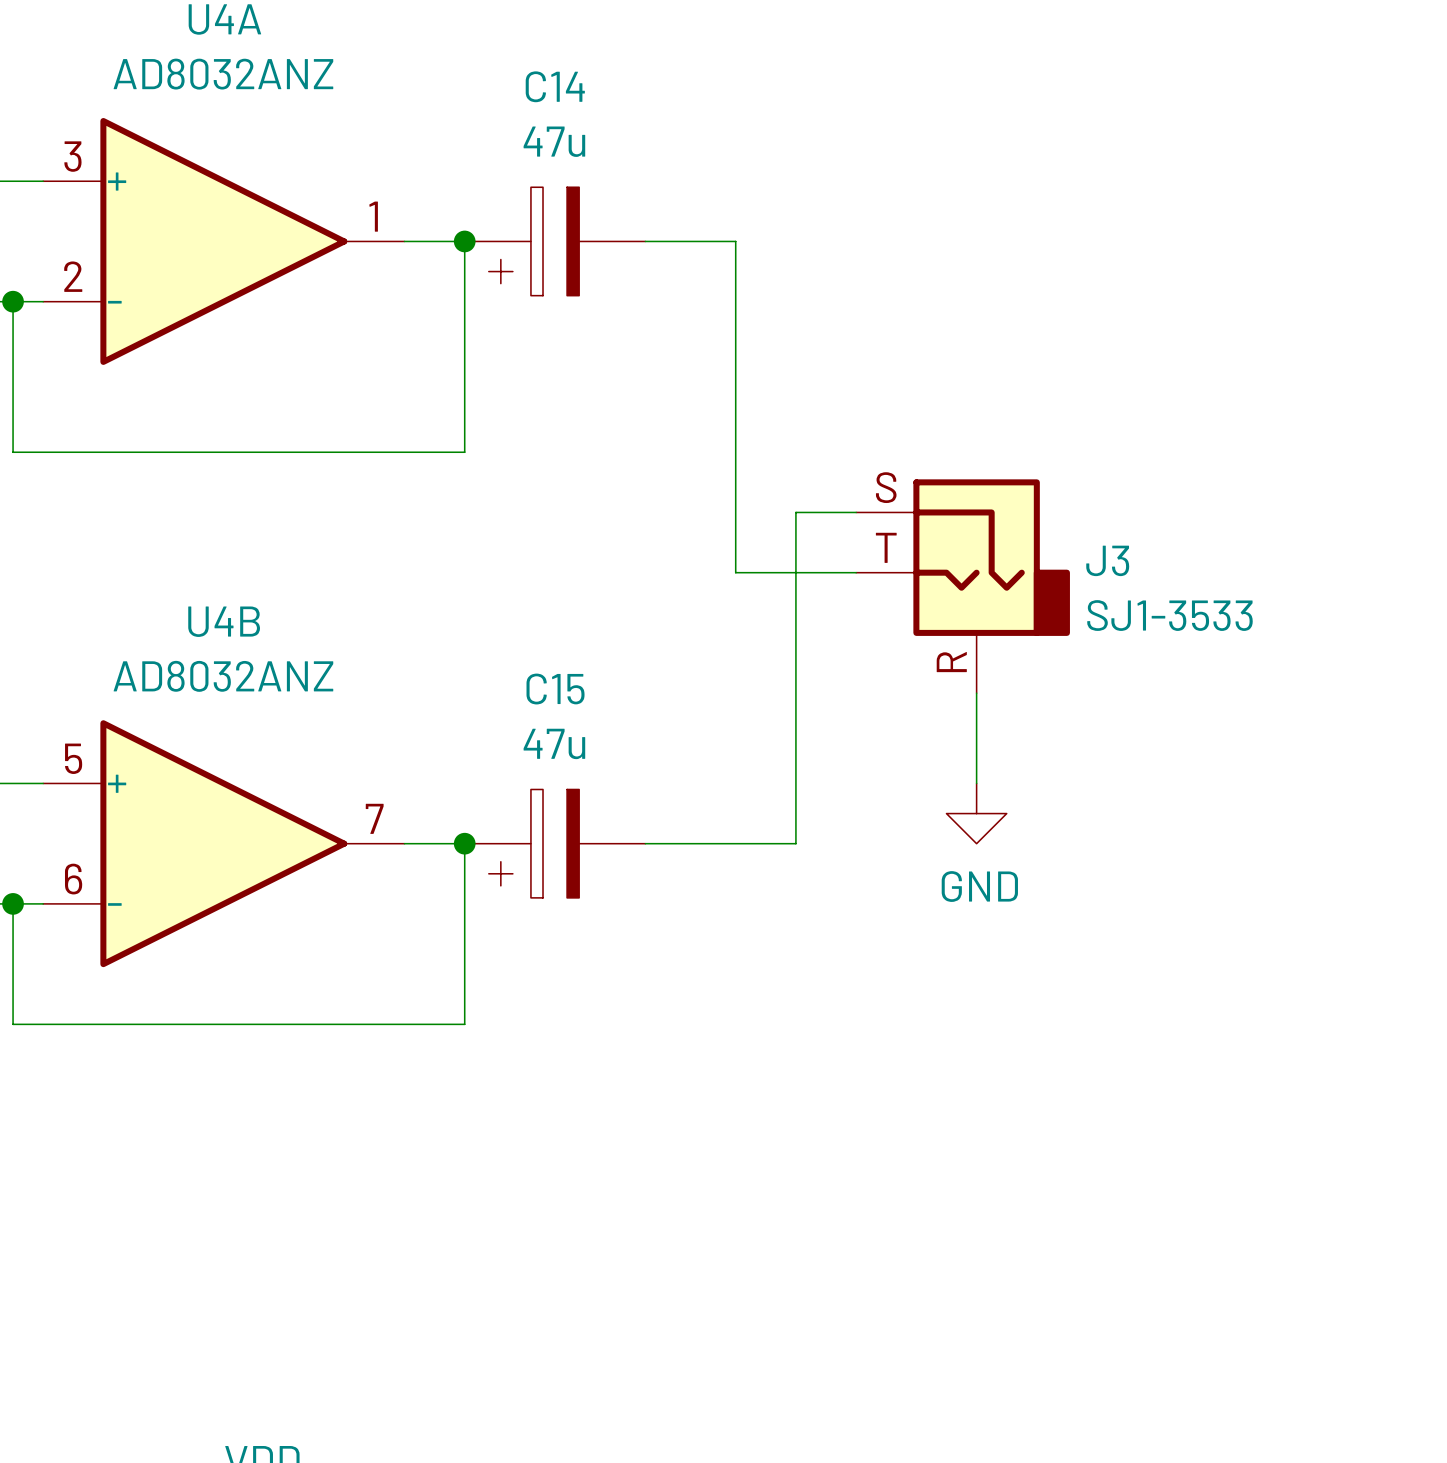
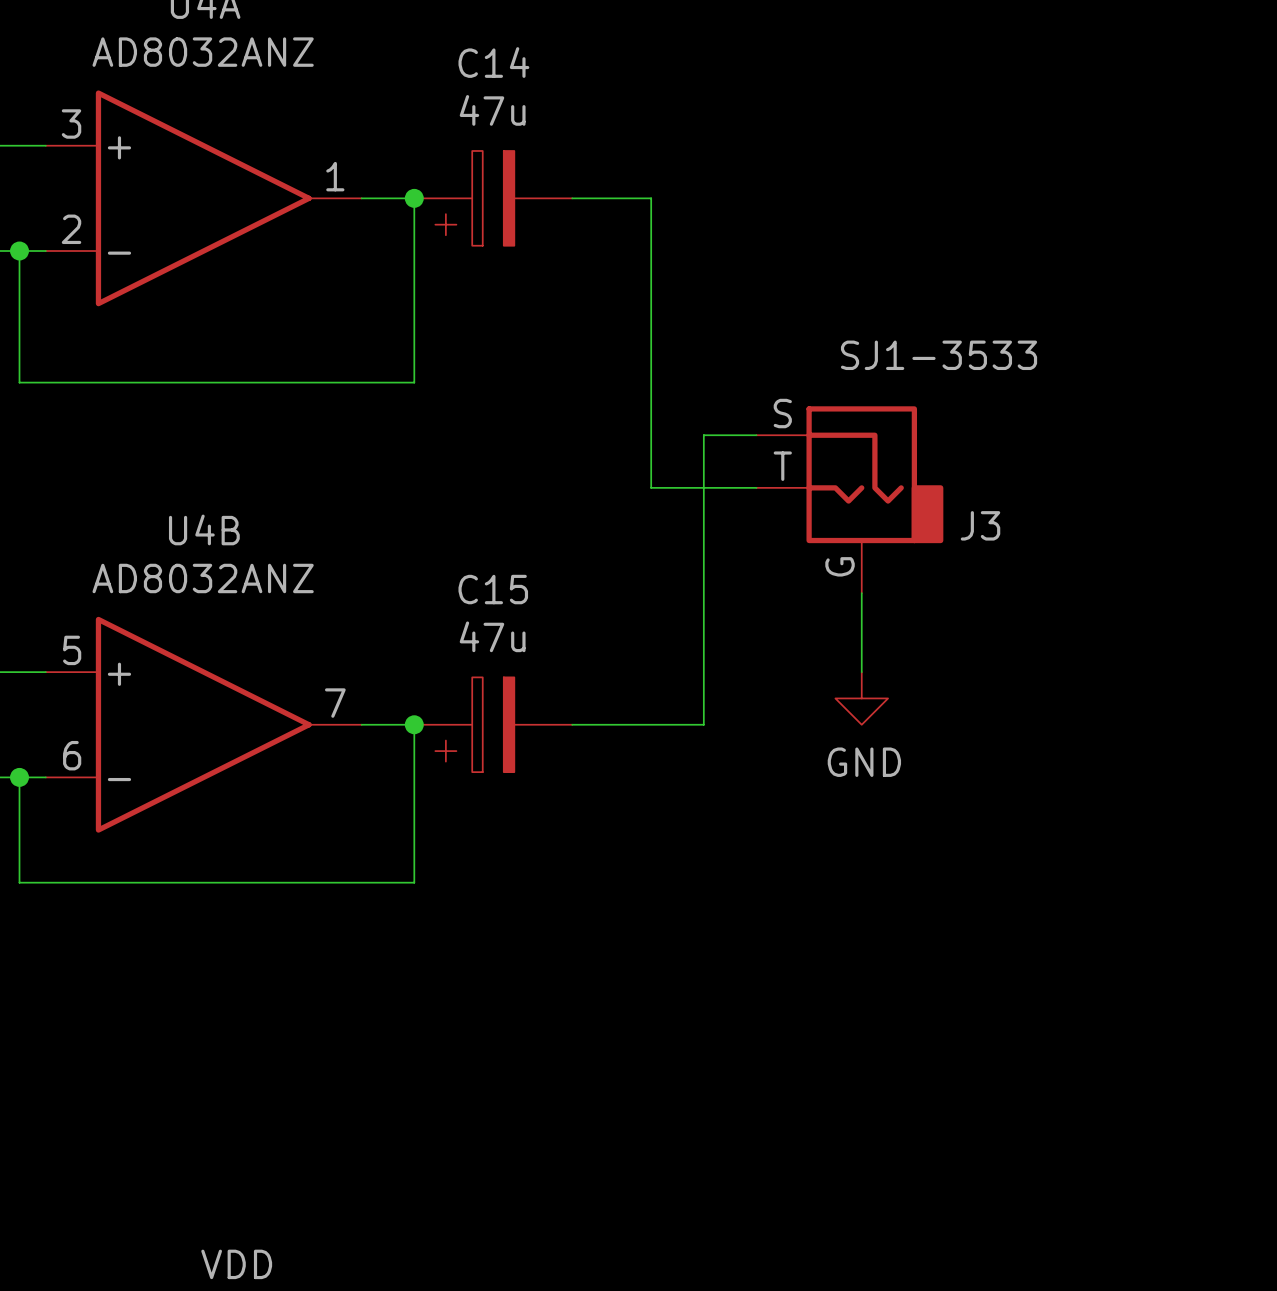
J3 name position: J3 (1107, 560) -> J3 (980, 525)
J3 value position: SJ1-3533 (1169, 615) -> SJ1-3533 (939, 355)
J3 pin number: R (951, 662) -> G (840, 566)

